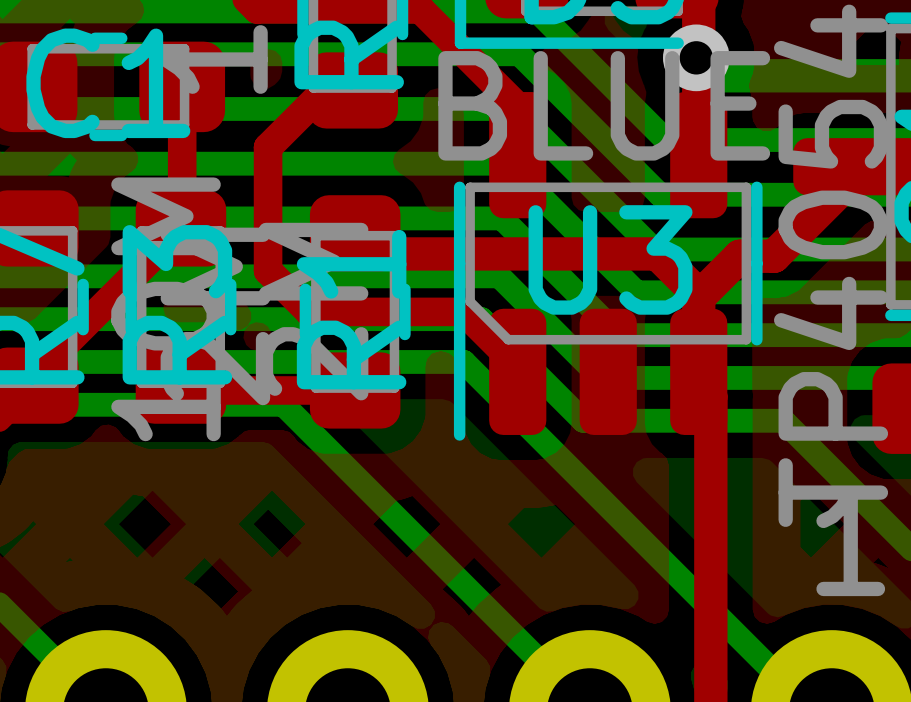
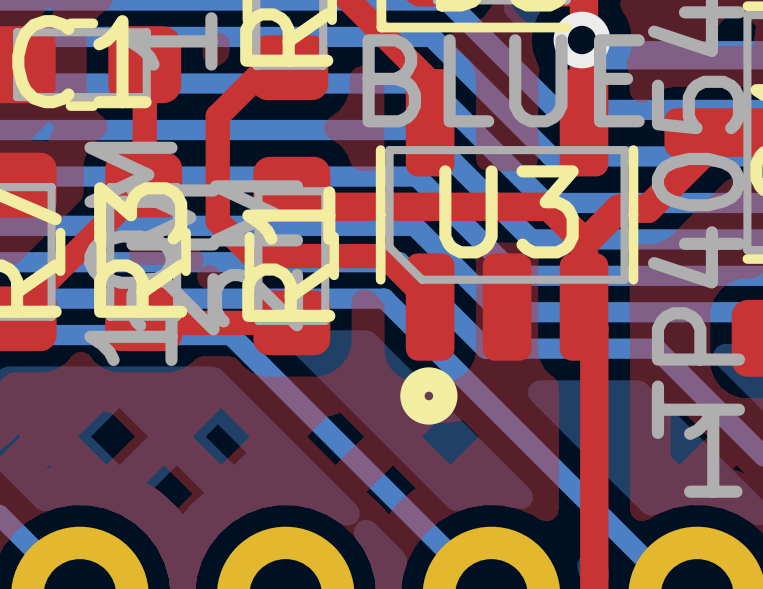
U3 footprint: [453, 92, 763, 441] -> [375, 69, 639, 425]

